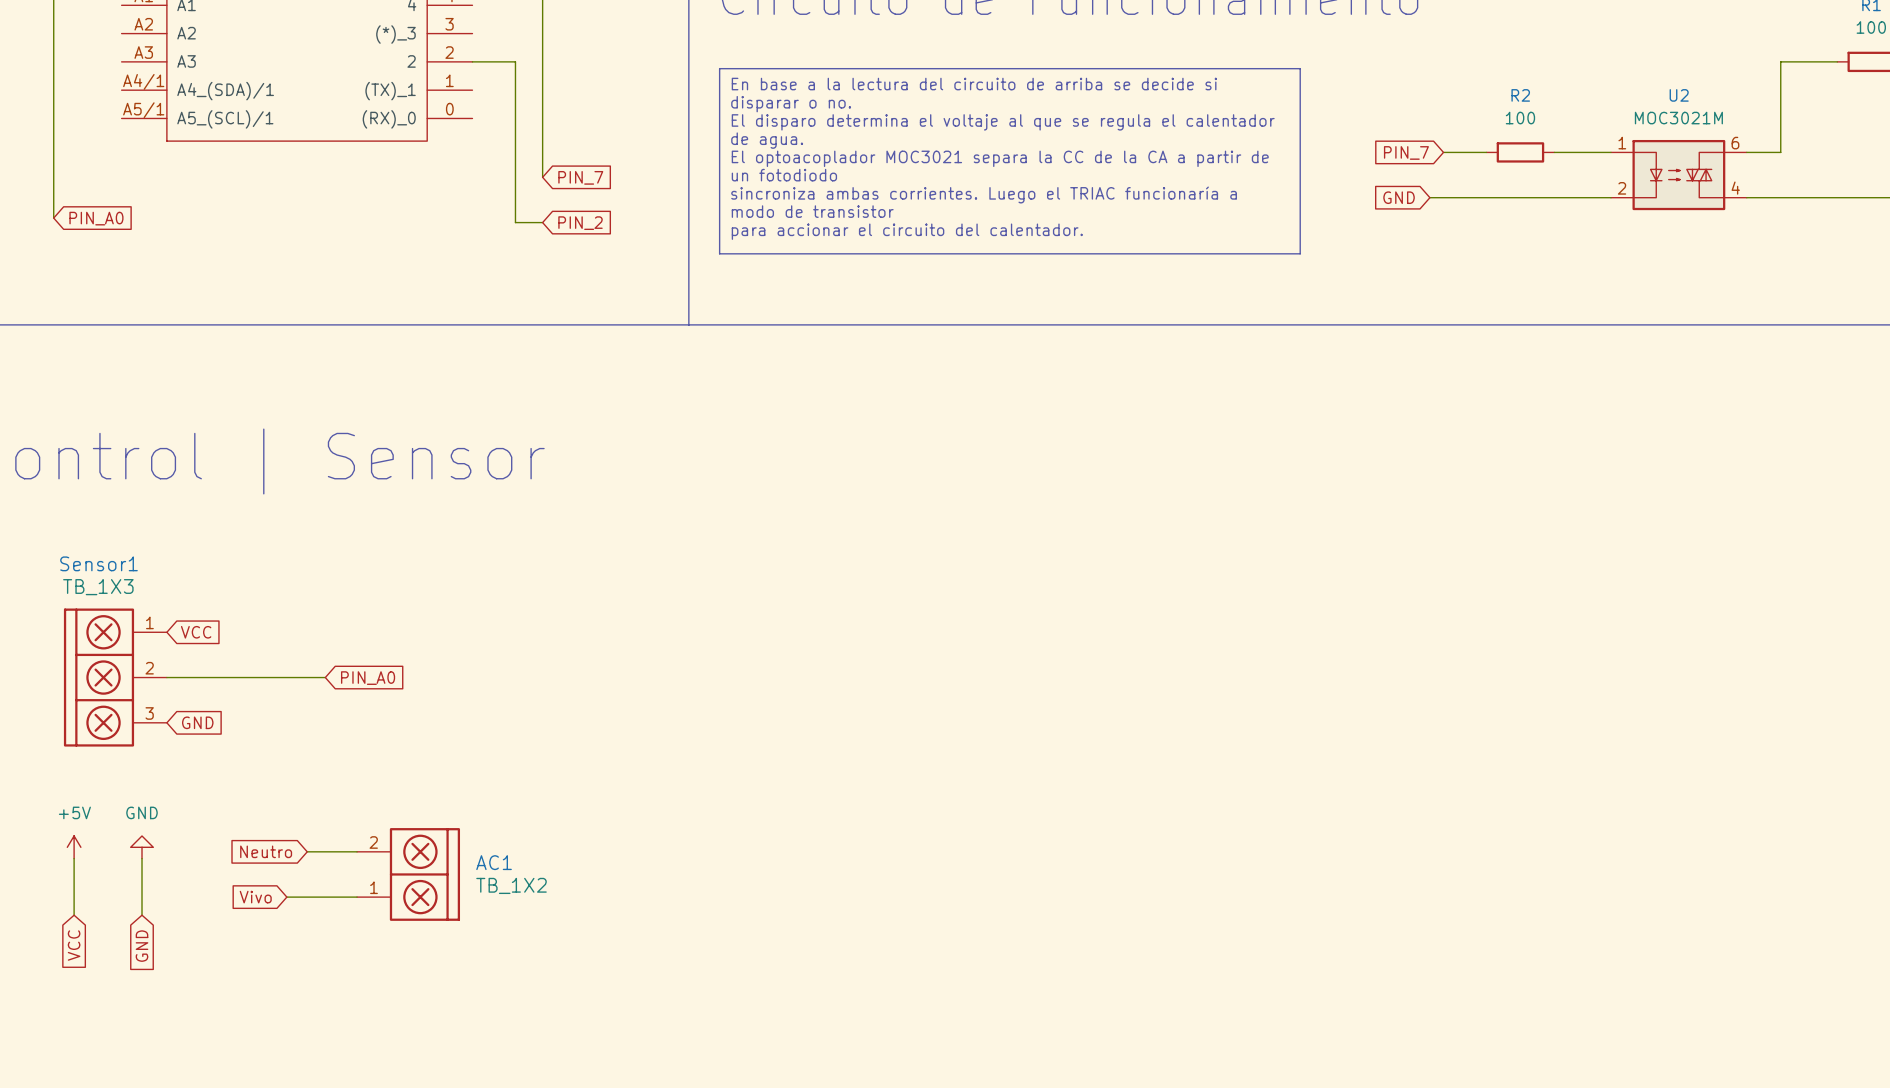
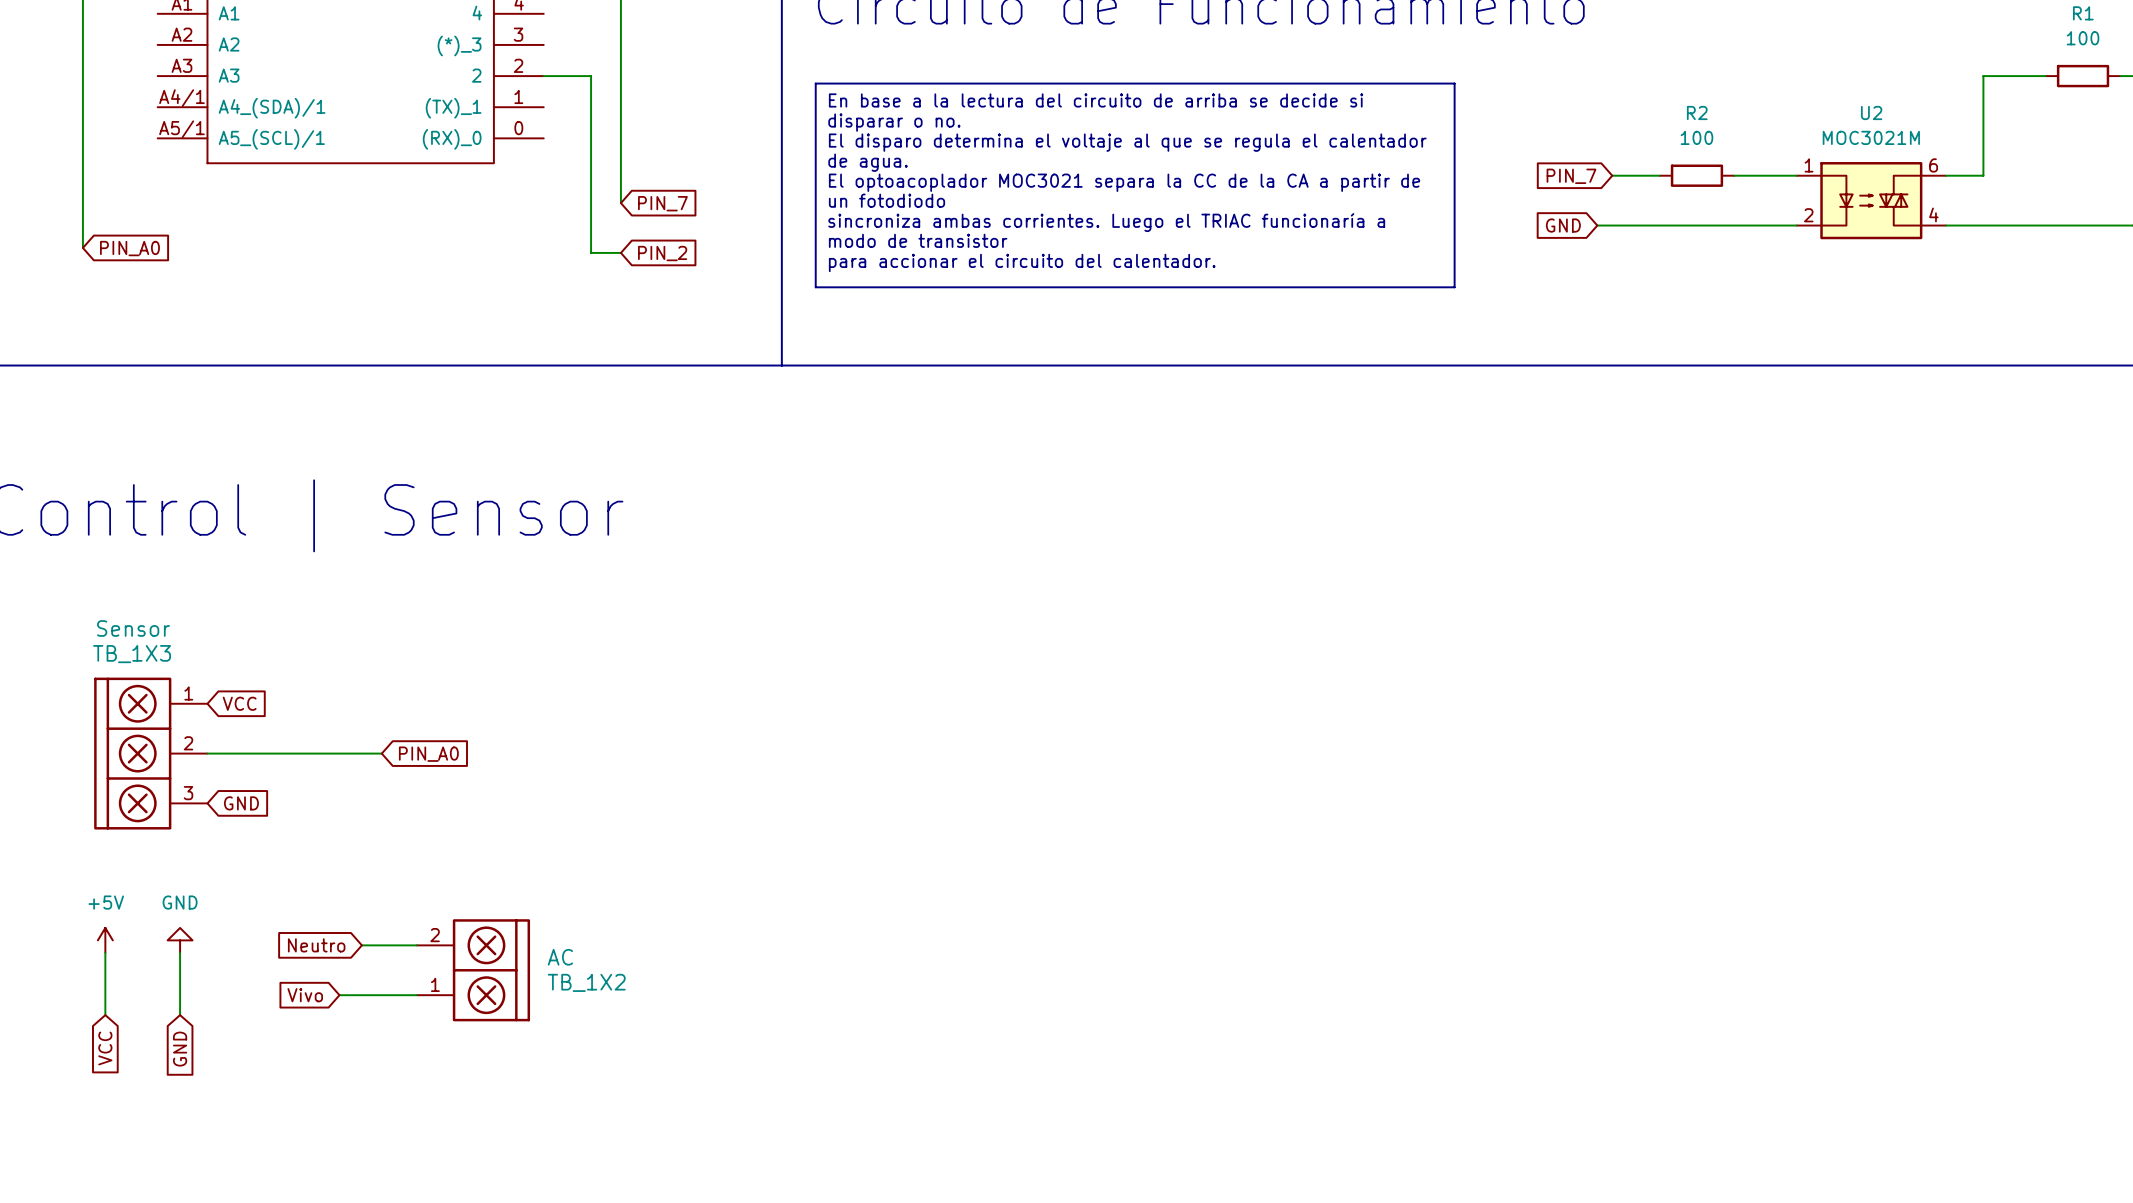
Sensor1 name: Sensor1 (98, 563) -> Sensor (133, 628)
AC1 name: AC1 (494, 862) -> AC (560, 957)

